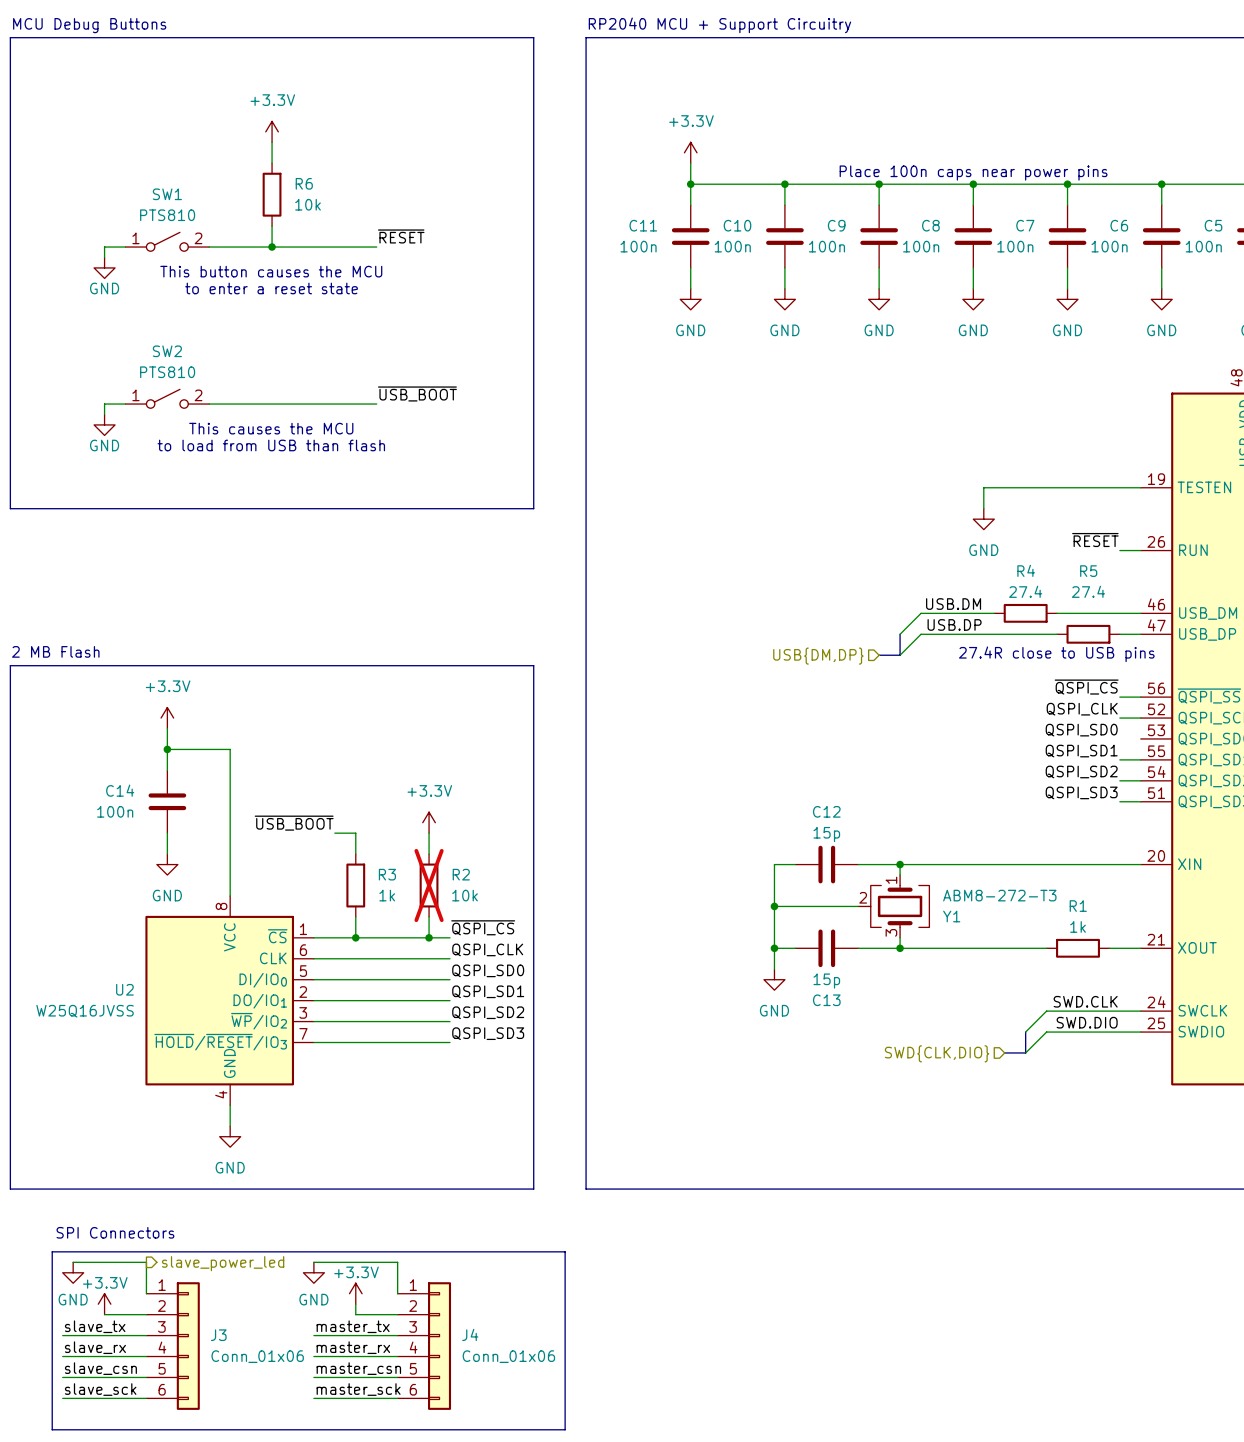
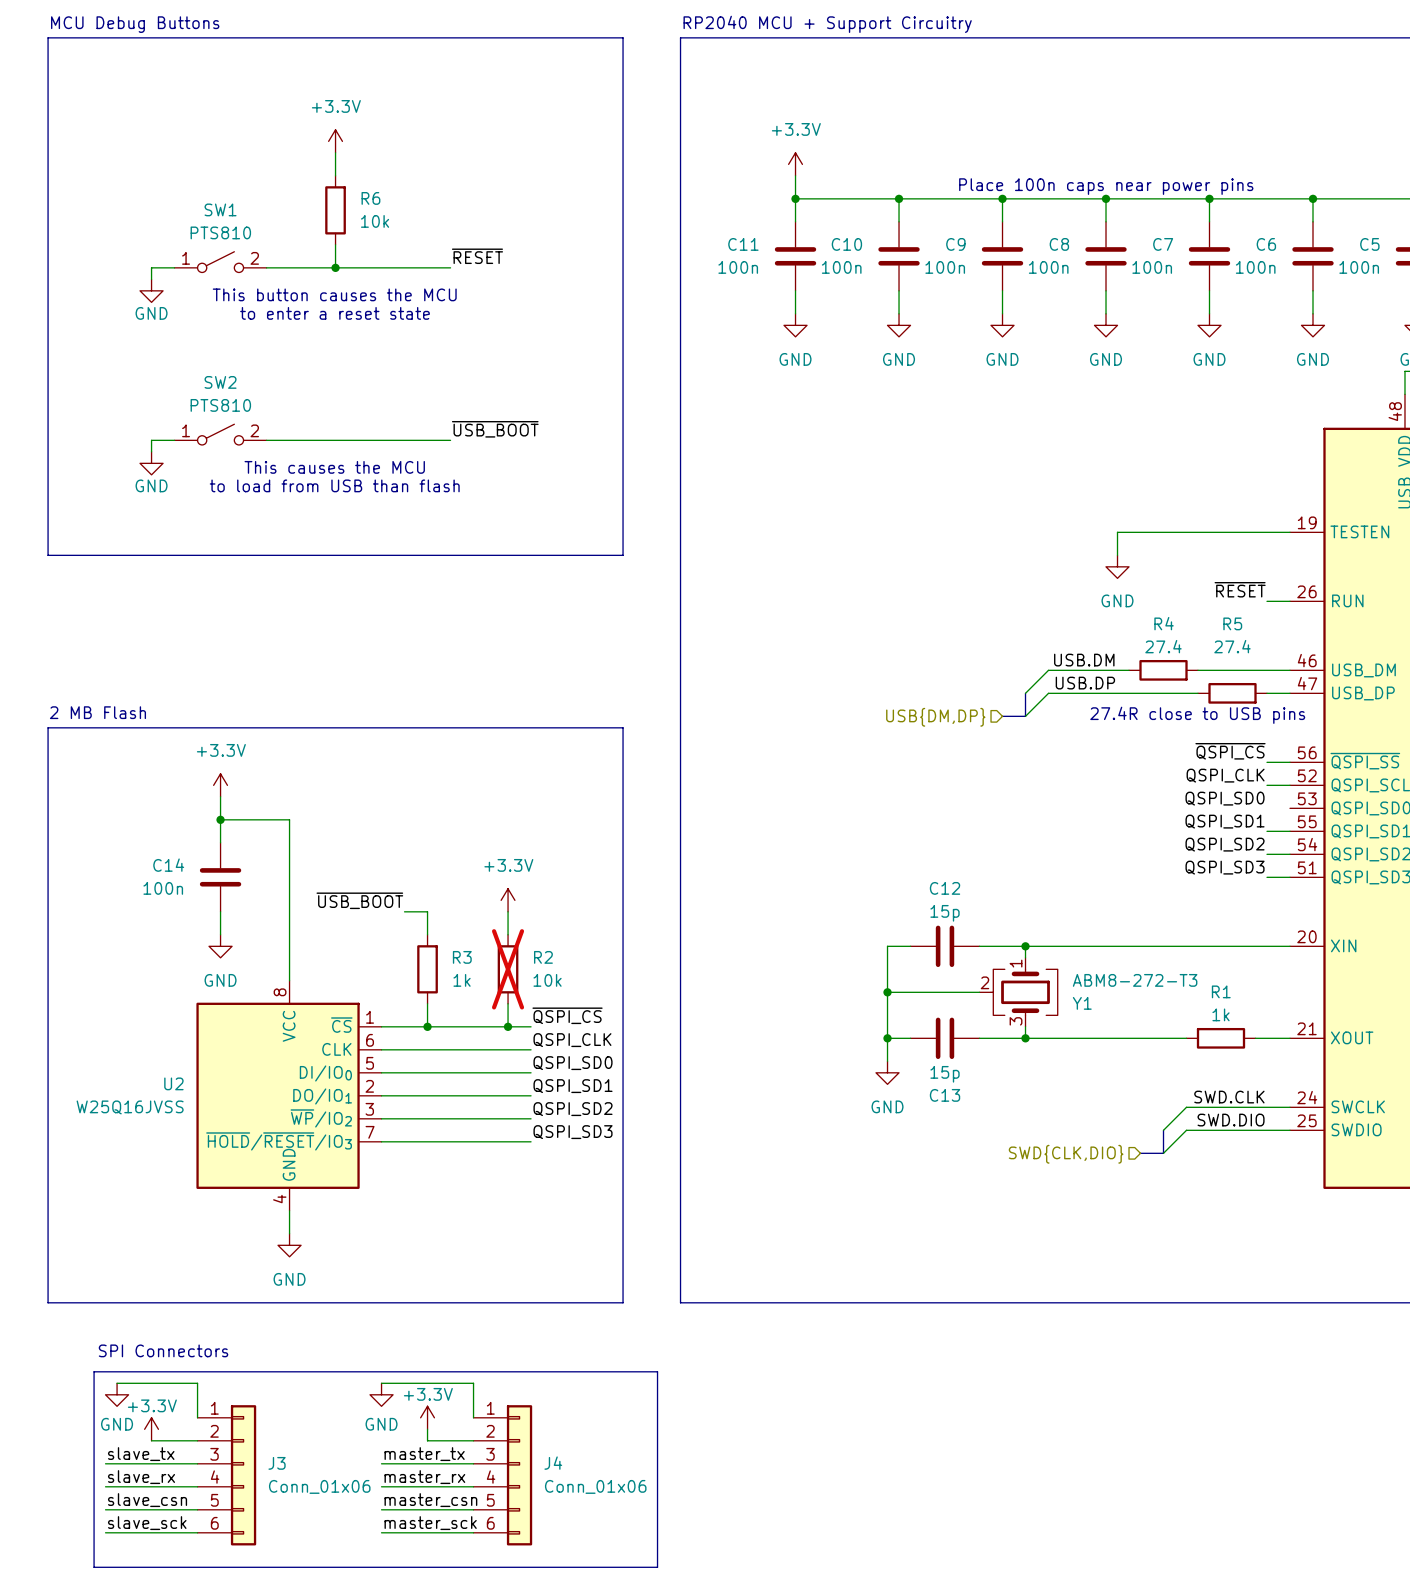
hierarchical label: slave_power_led (223, 1263) -> none

